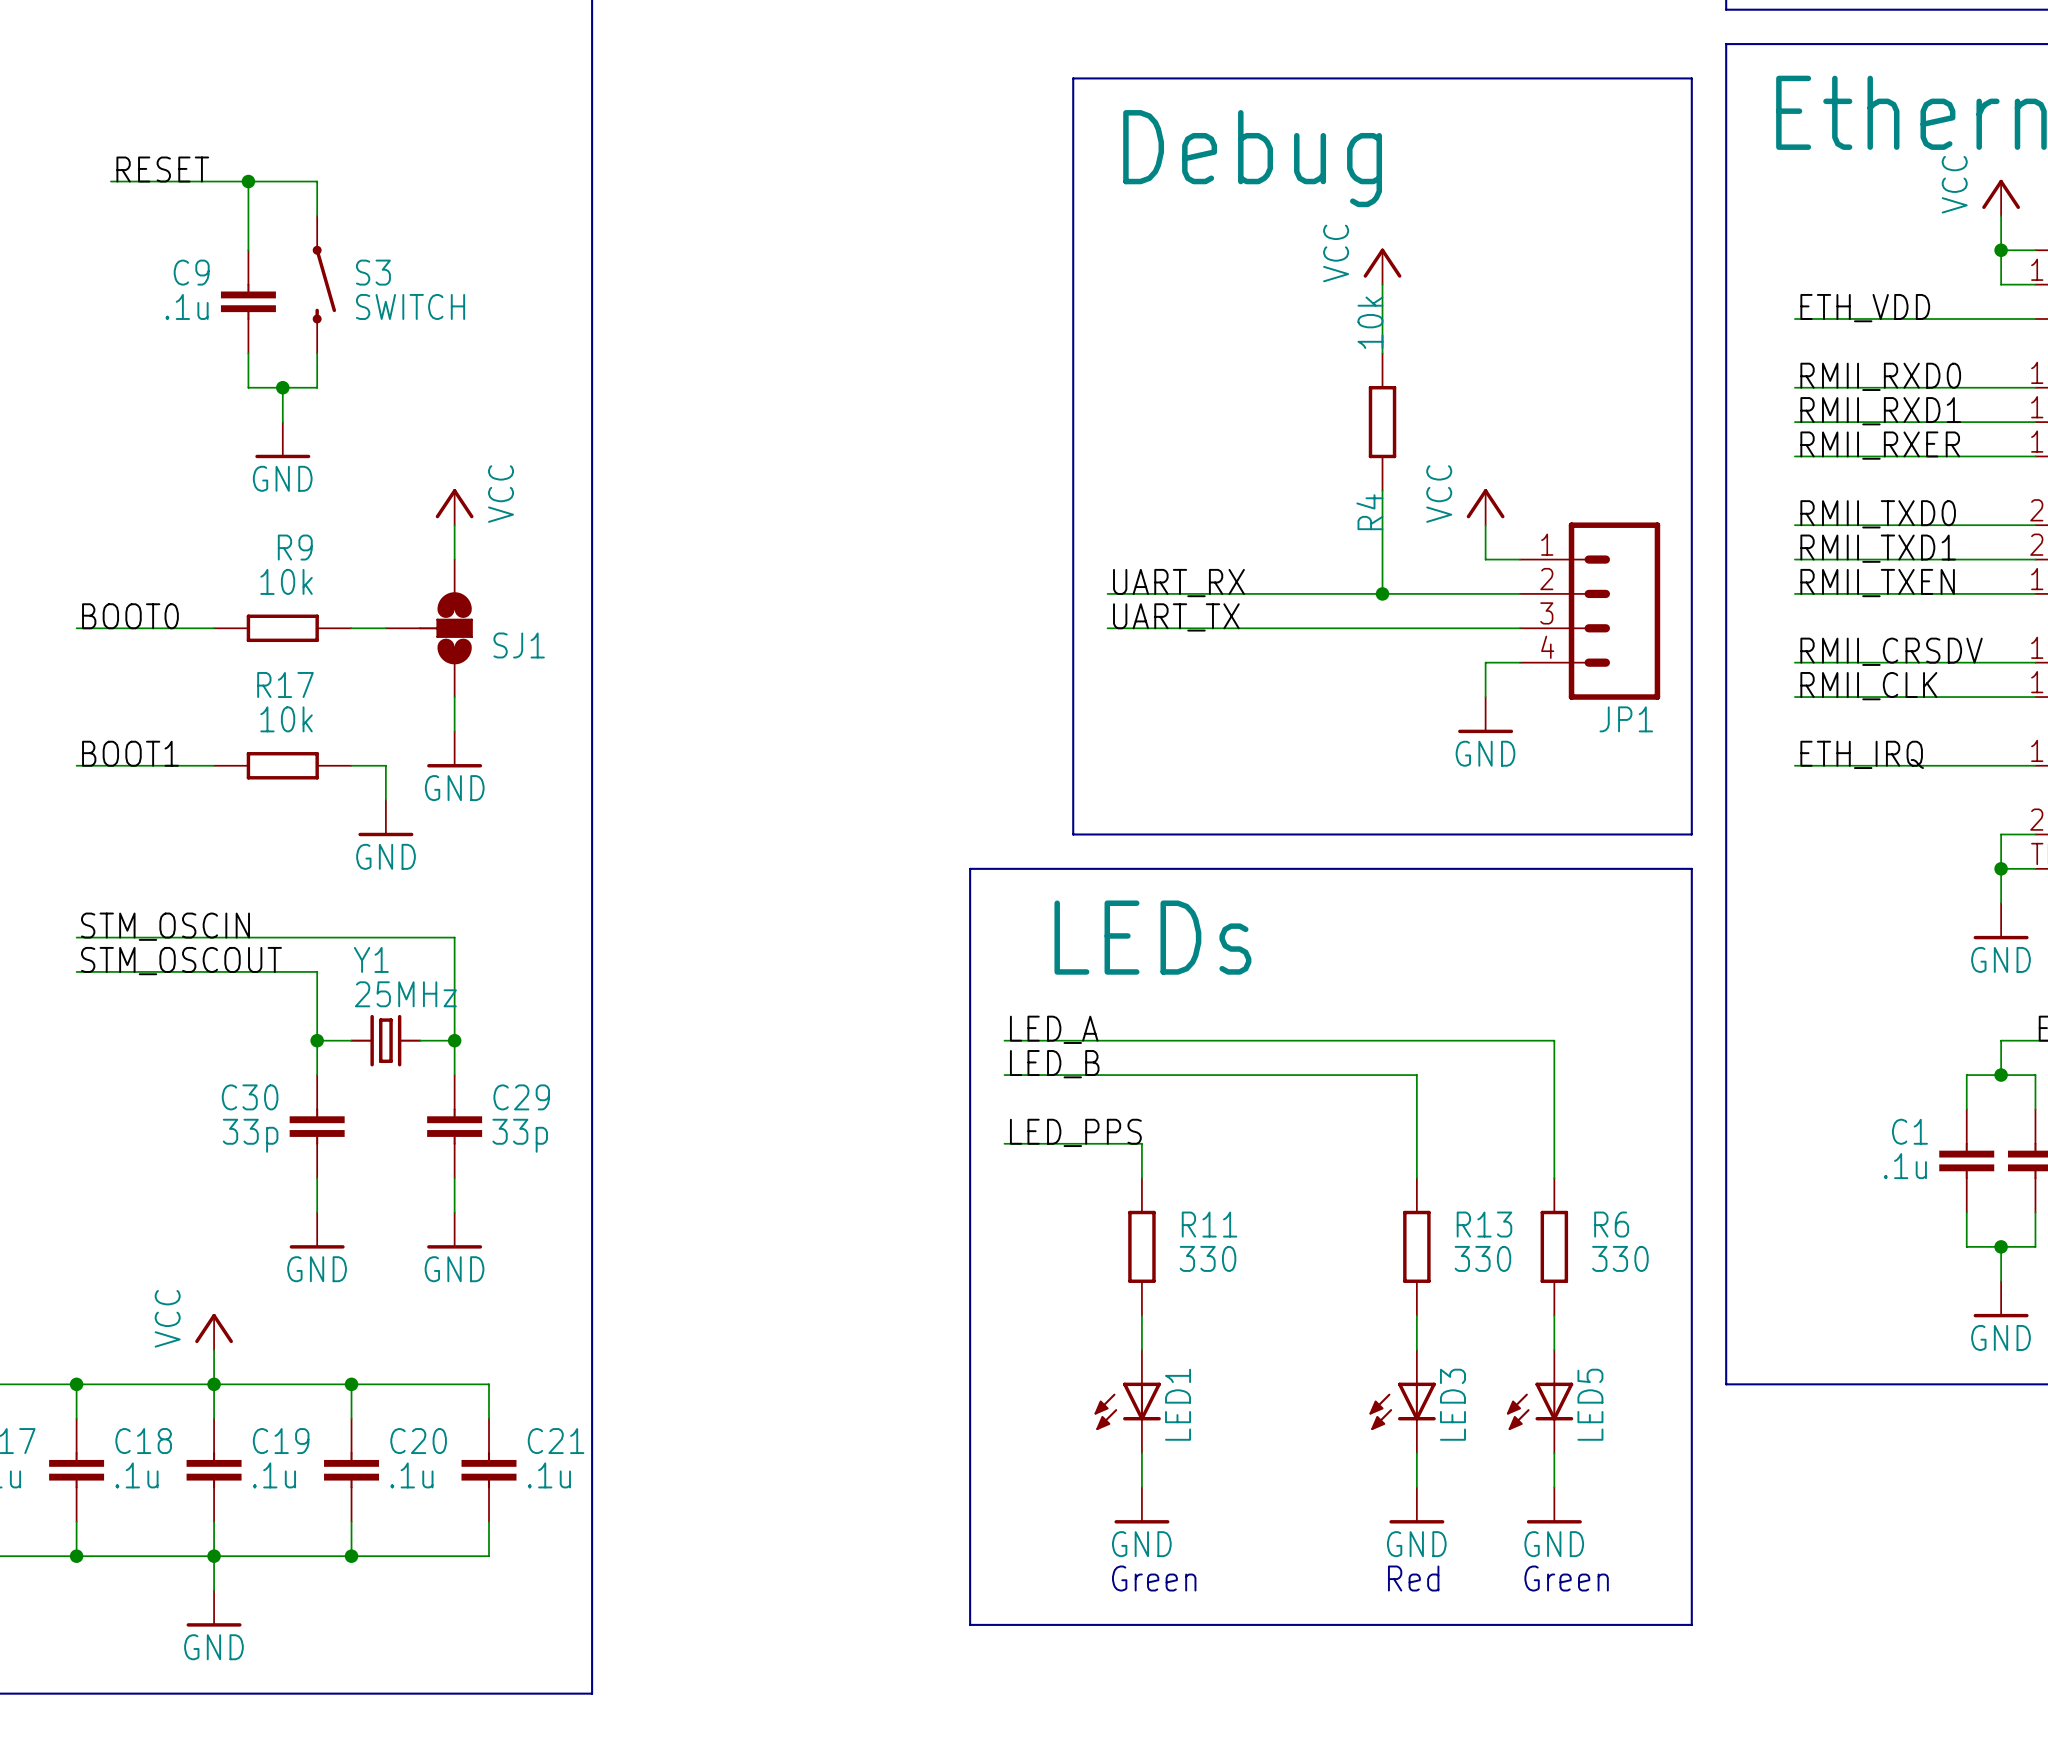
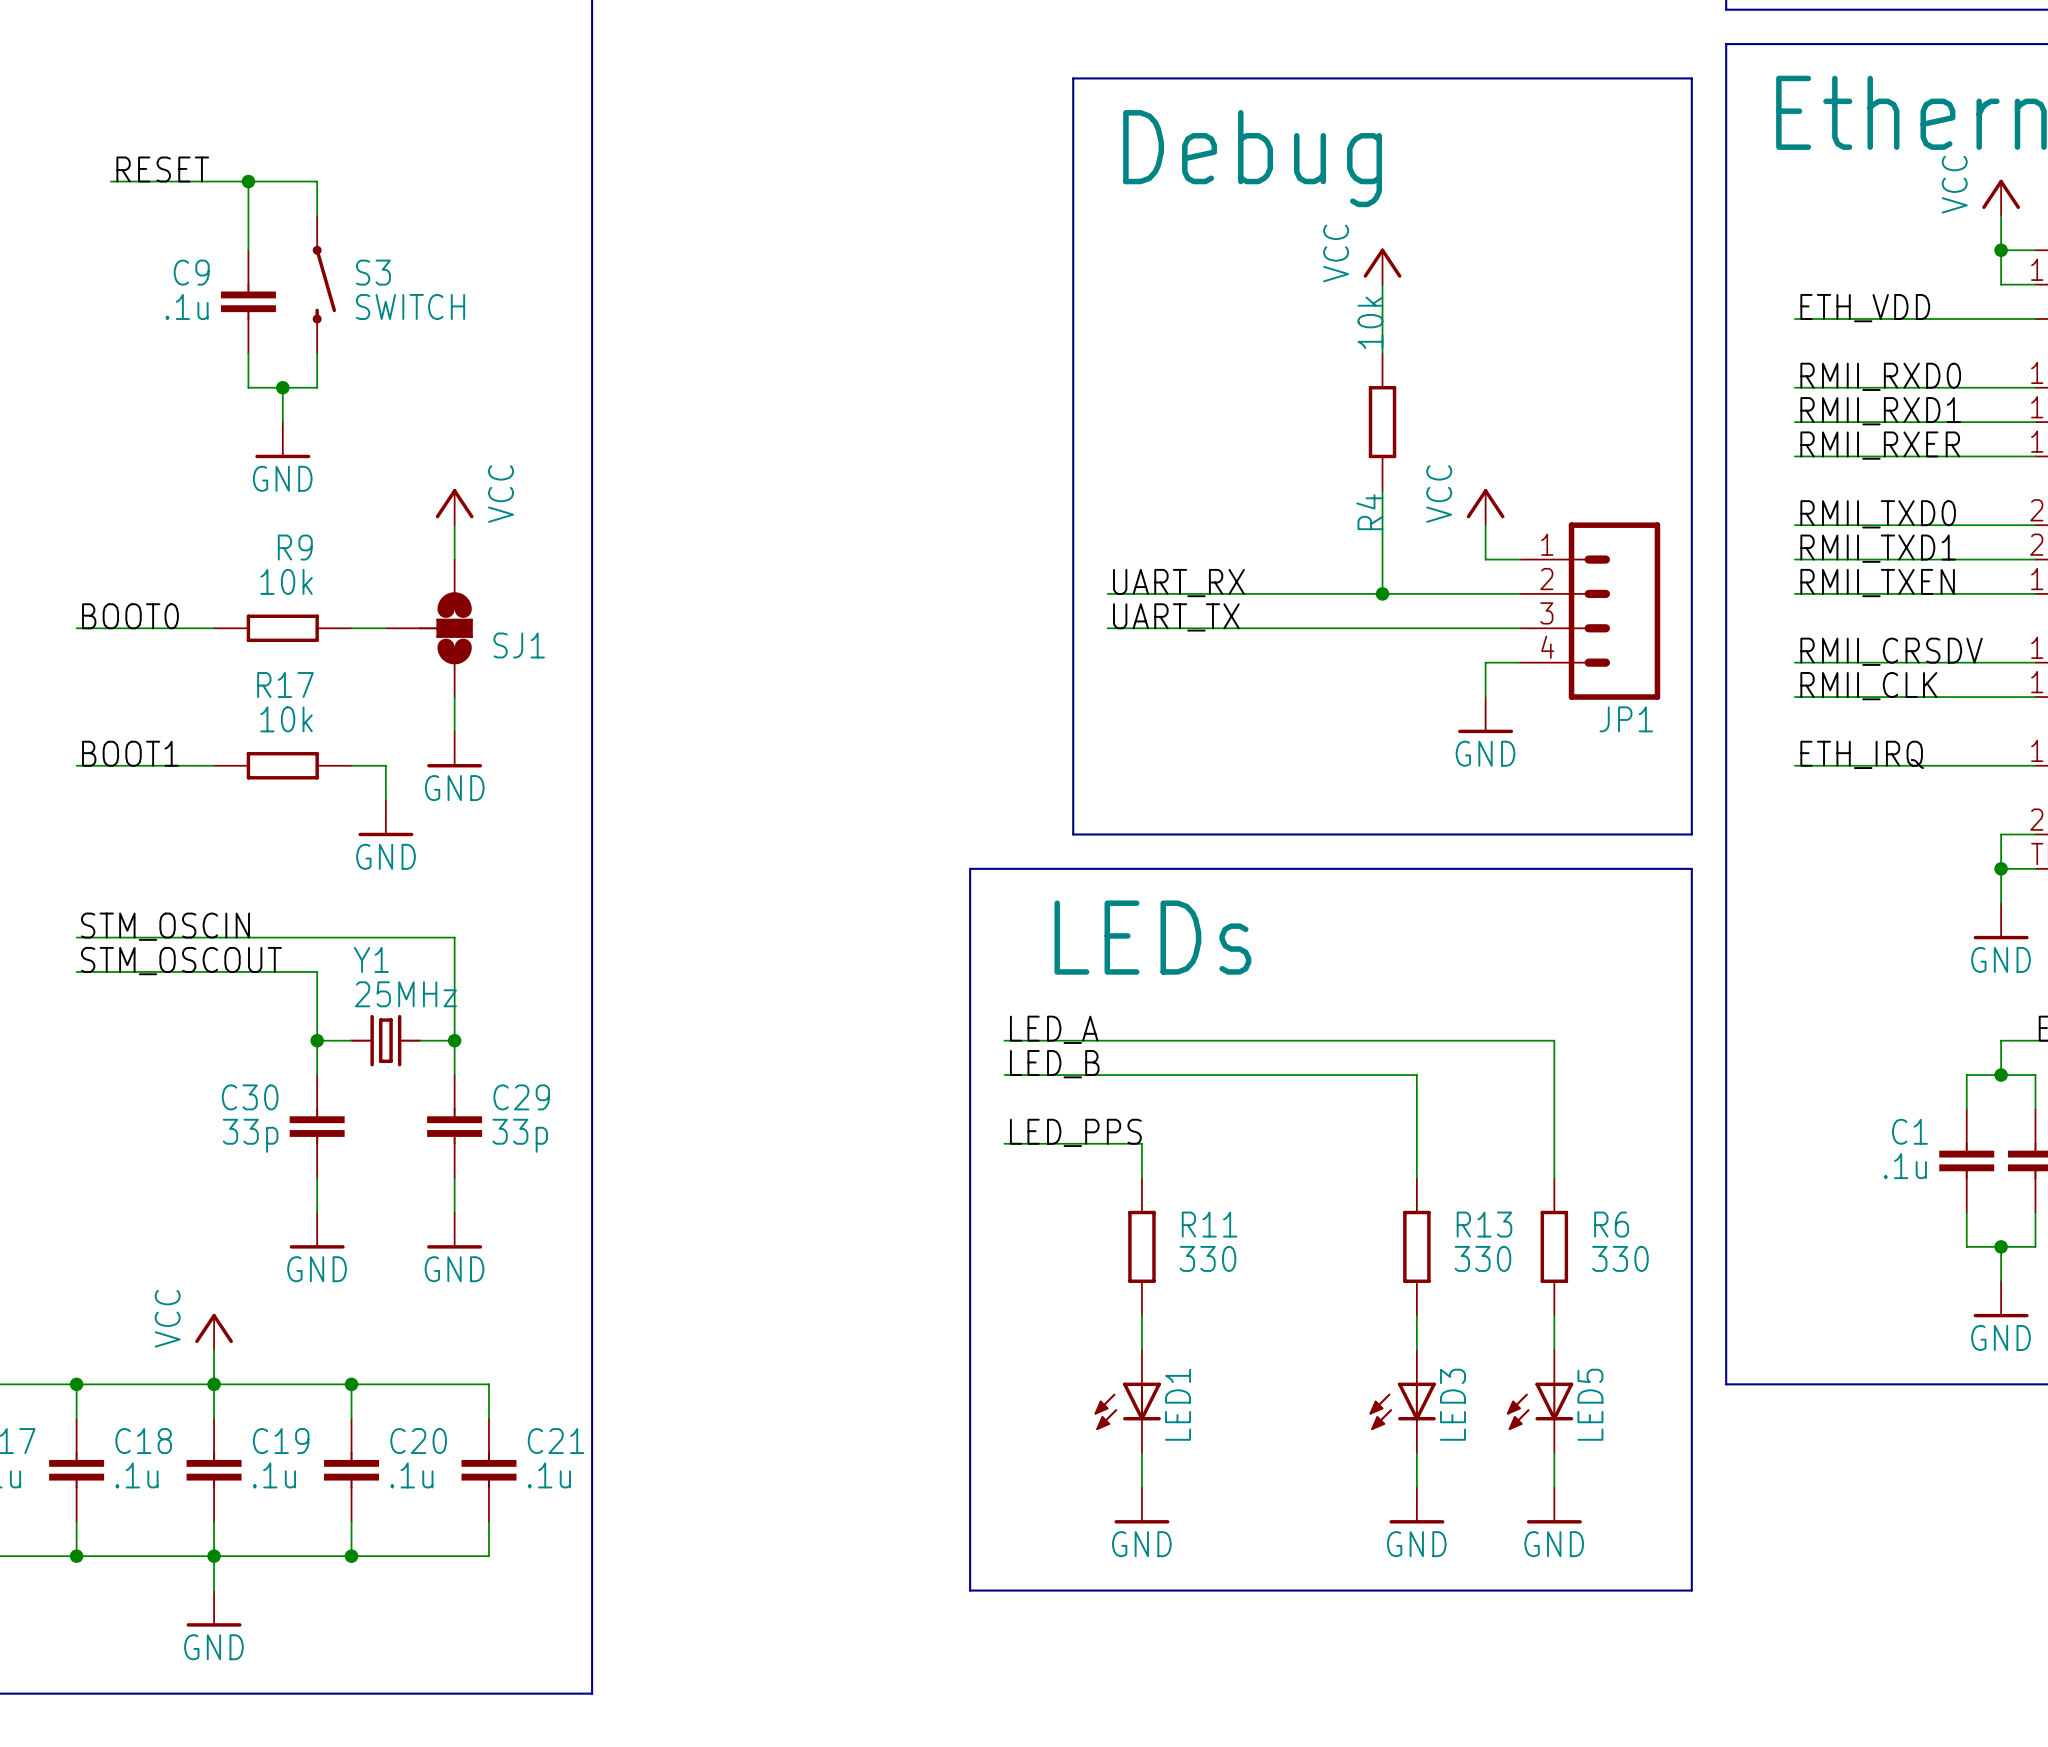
text: Green (1154, 1578) -> none
text: Red (1413, 1578) -> none
text: Green (1566, 1578) -> none
line: (970, 1590) (970, 1624) (1691, 1624) (1691, 1590) -> (970, 1590) (1691, 1590)

